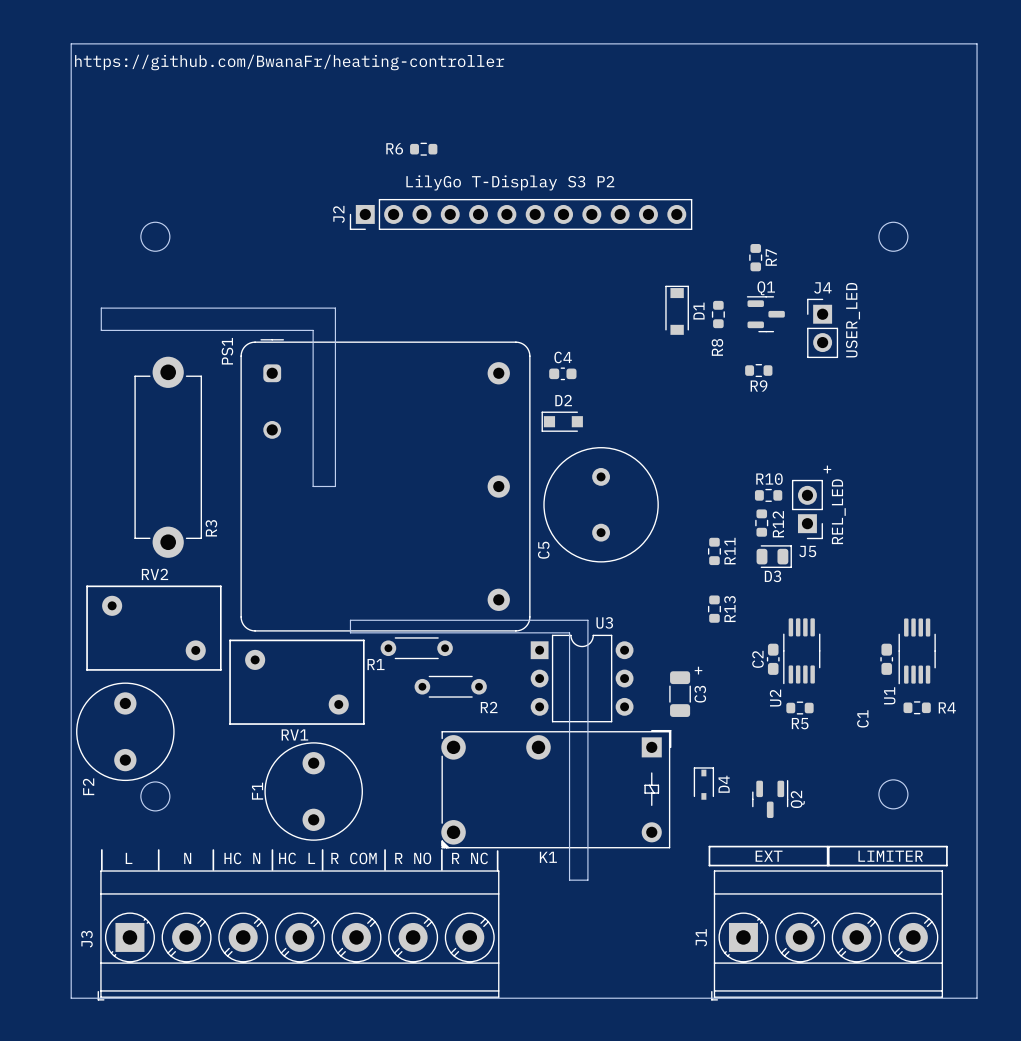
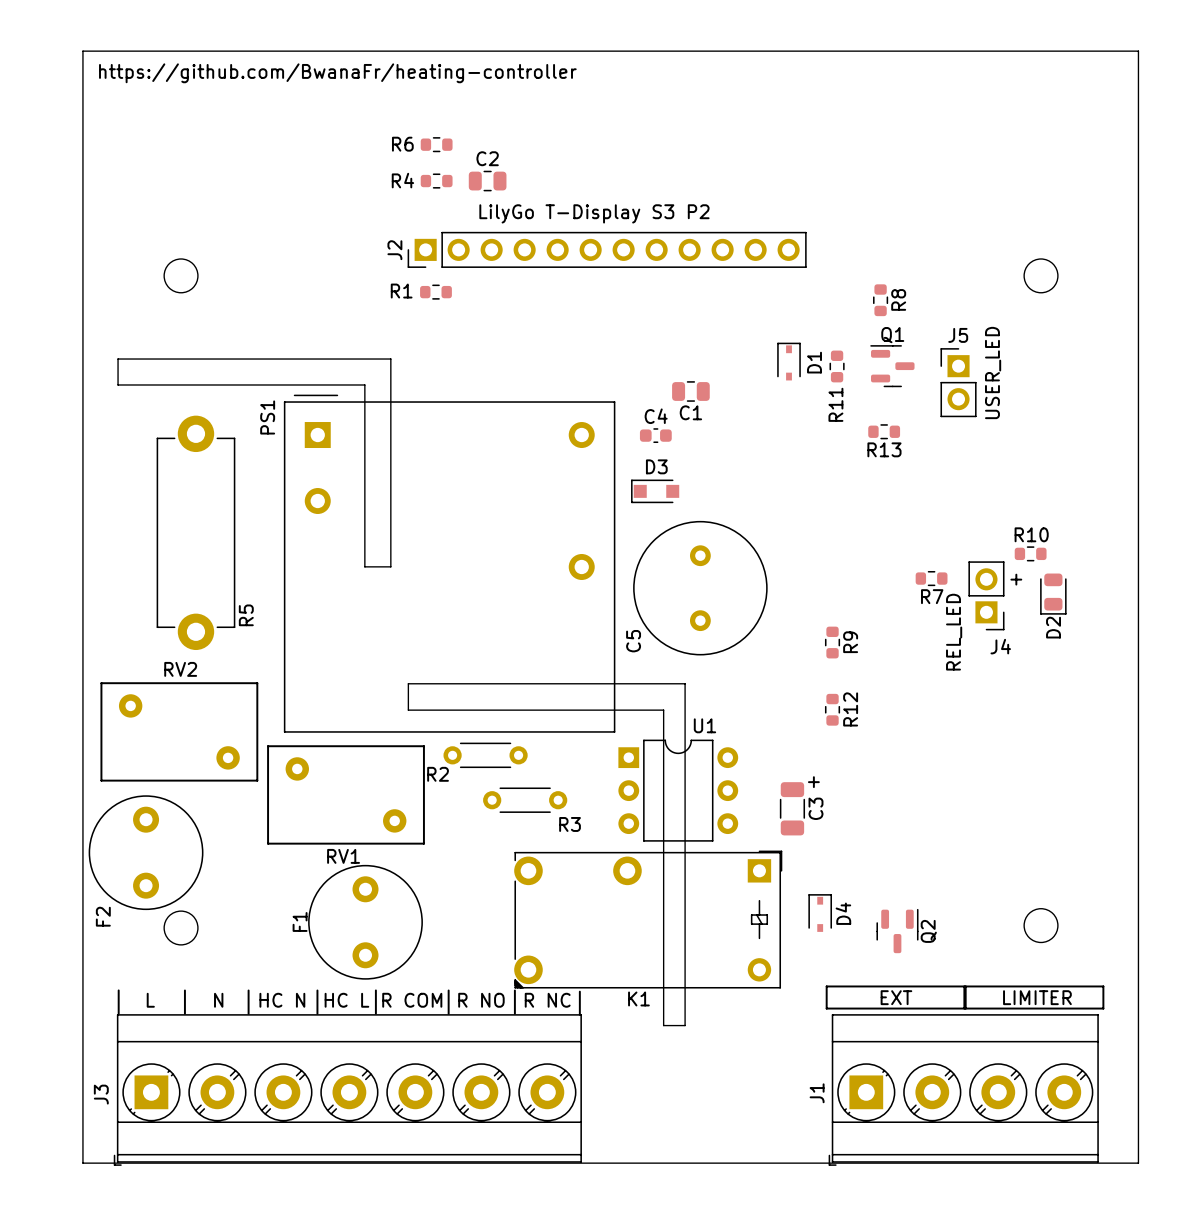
R6 position: (423, 149) -> (436, 144)
R1: none -> (435, 292)
R7 name: R7 (771, 257) -> R8 (898, 299)
D1 footprint: [665, 285, 689, 335] -> [777, 342, 801, 381]
J4 name: J4 (822, 287) -> J5 (958, 335)
PS1 footprint: [240, 339, 531, 632] -> [283, 394, 616, 733]
R8 name: R8 (717, 347) -> R11 (835, 404)
R9 name: R9 (759, 385) -> R13 (884, 449)
D2 name: D2 (563, 400) -> D3 (656, 466)
text position: + (827, 469) -> + (1016, 579)
R10 position: (768, 495) -> (1030, 553)
R7: none -> (931, 578)
J5: (807, 509) -> none
D2: none -> (1053, 594)
text position: REL_LED (838, 511) -> REL_LED (954, 632)
J4: none -> (986, 595)
R12: (761, 523) -> none
R3 name: R3 (211, 528) -> R5 (246, 615)
R11 name: R11 (730, 551) -> R9 (850, 642)
D3: (774, 556) -> none
R13 name: R13 (730, 609) -> R12 (850, 709)
board edge: (587, 620) (350, 620) (350, 632) (569, 632) -> (685, 722) (685, 683) (408, 683) (408, 710) (663, 710) (663, 737)
U3 name: U3 (604, 622) -> U1 (704, 725)
C2 footprint: [766, 643, 780, 675] -> [468, 170, 507, 192]
C1 footprint: [880, 643, 894, 675] -> [672, 381, 710, 402]
U2: (801, 651) -> none
U1: (917, 651) -> none
C2 name position: C2 (757, 659) -> C2 (487, 158)
R1 name: R1 (376, 664) -> R2 (438, 774)
R2 name: R2 (489, 707) -> R3 (570, 824)
R4 position: (917, 707) -> (436, 181)
R4 name position: R4 (947, 707) -> R4 (402, 180)
R5: (799, 708) -> none
C1 name position: C1 (862, 718) -> C1 (690, 412)

